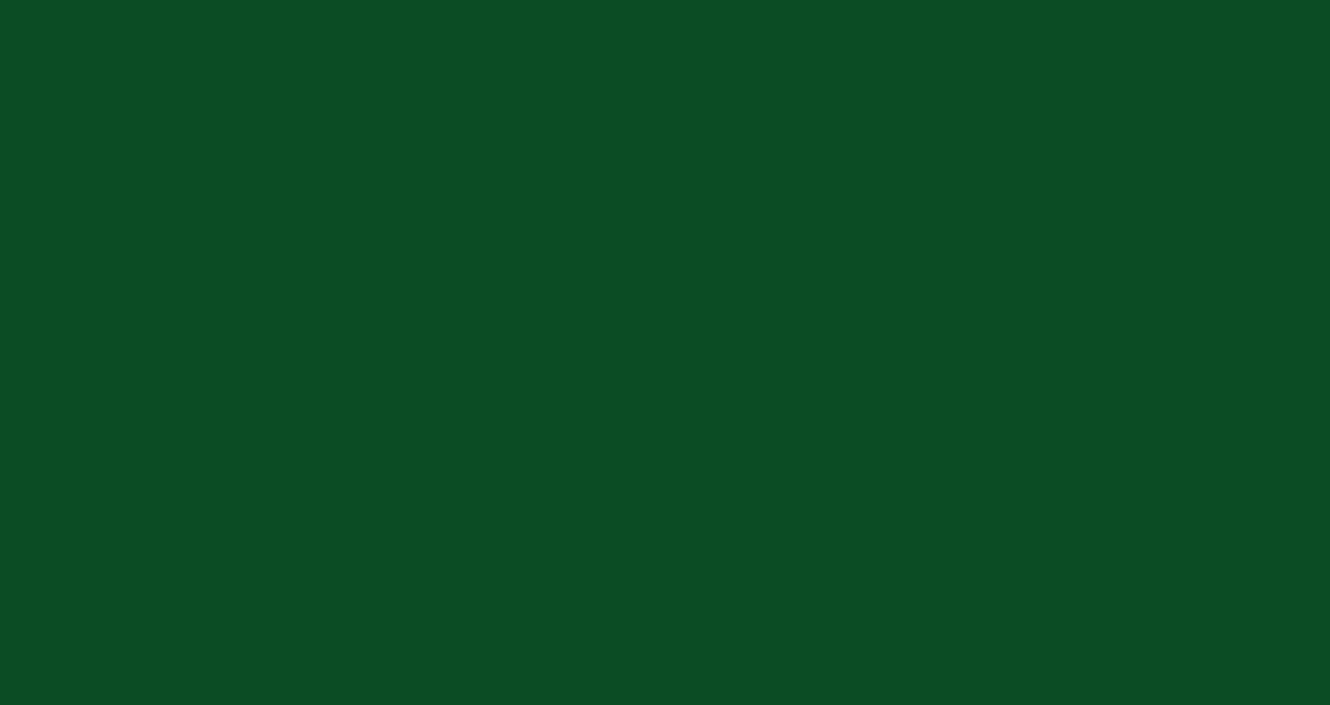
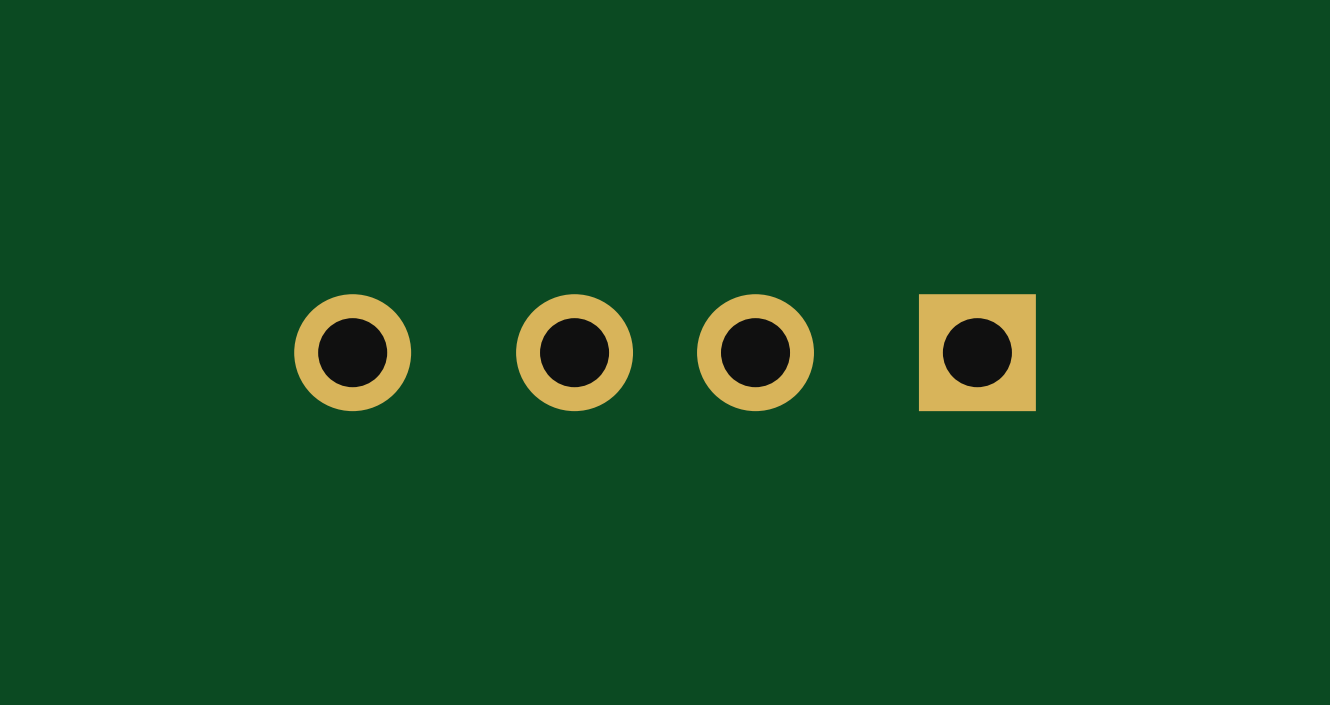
part: none -> (665, 352)

